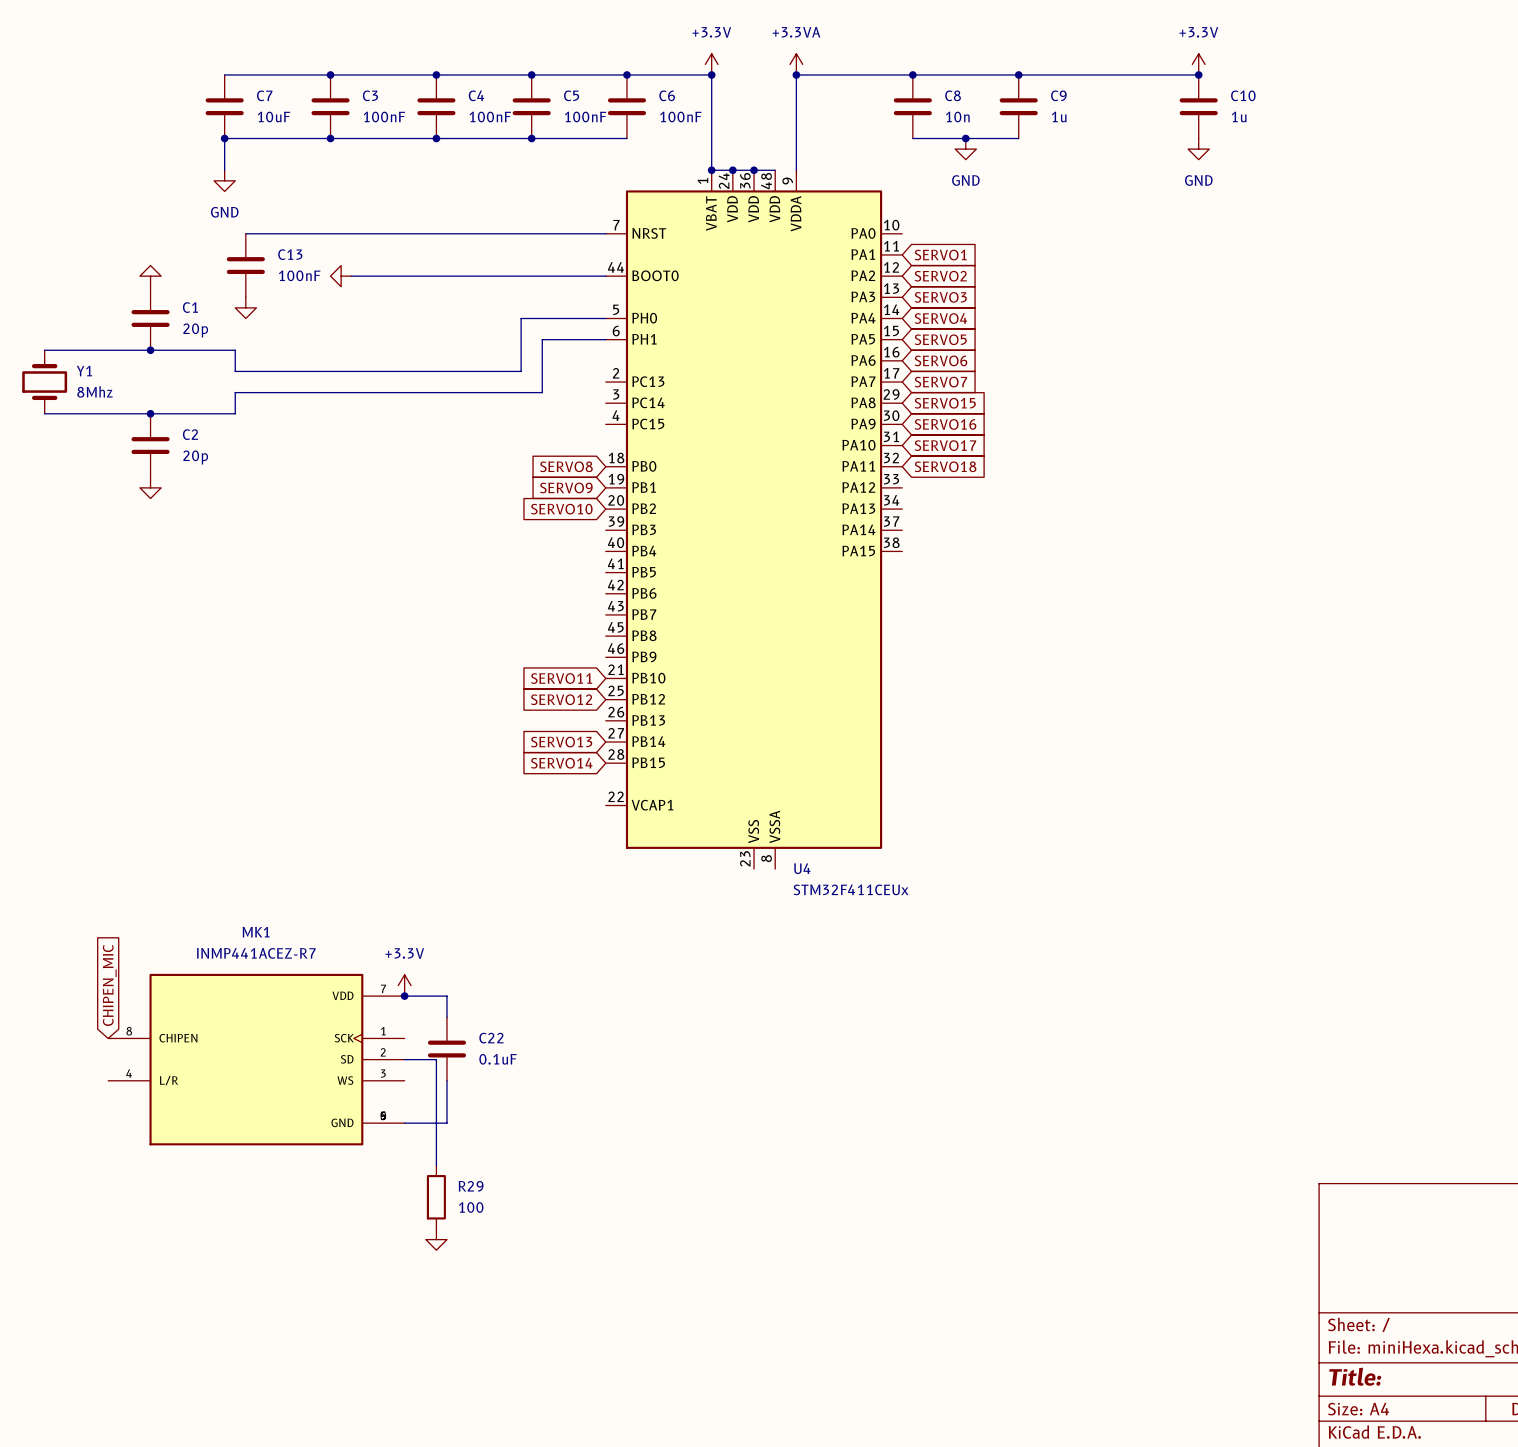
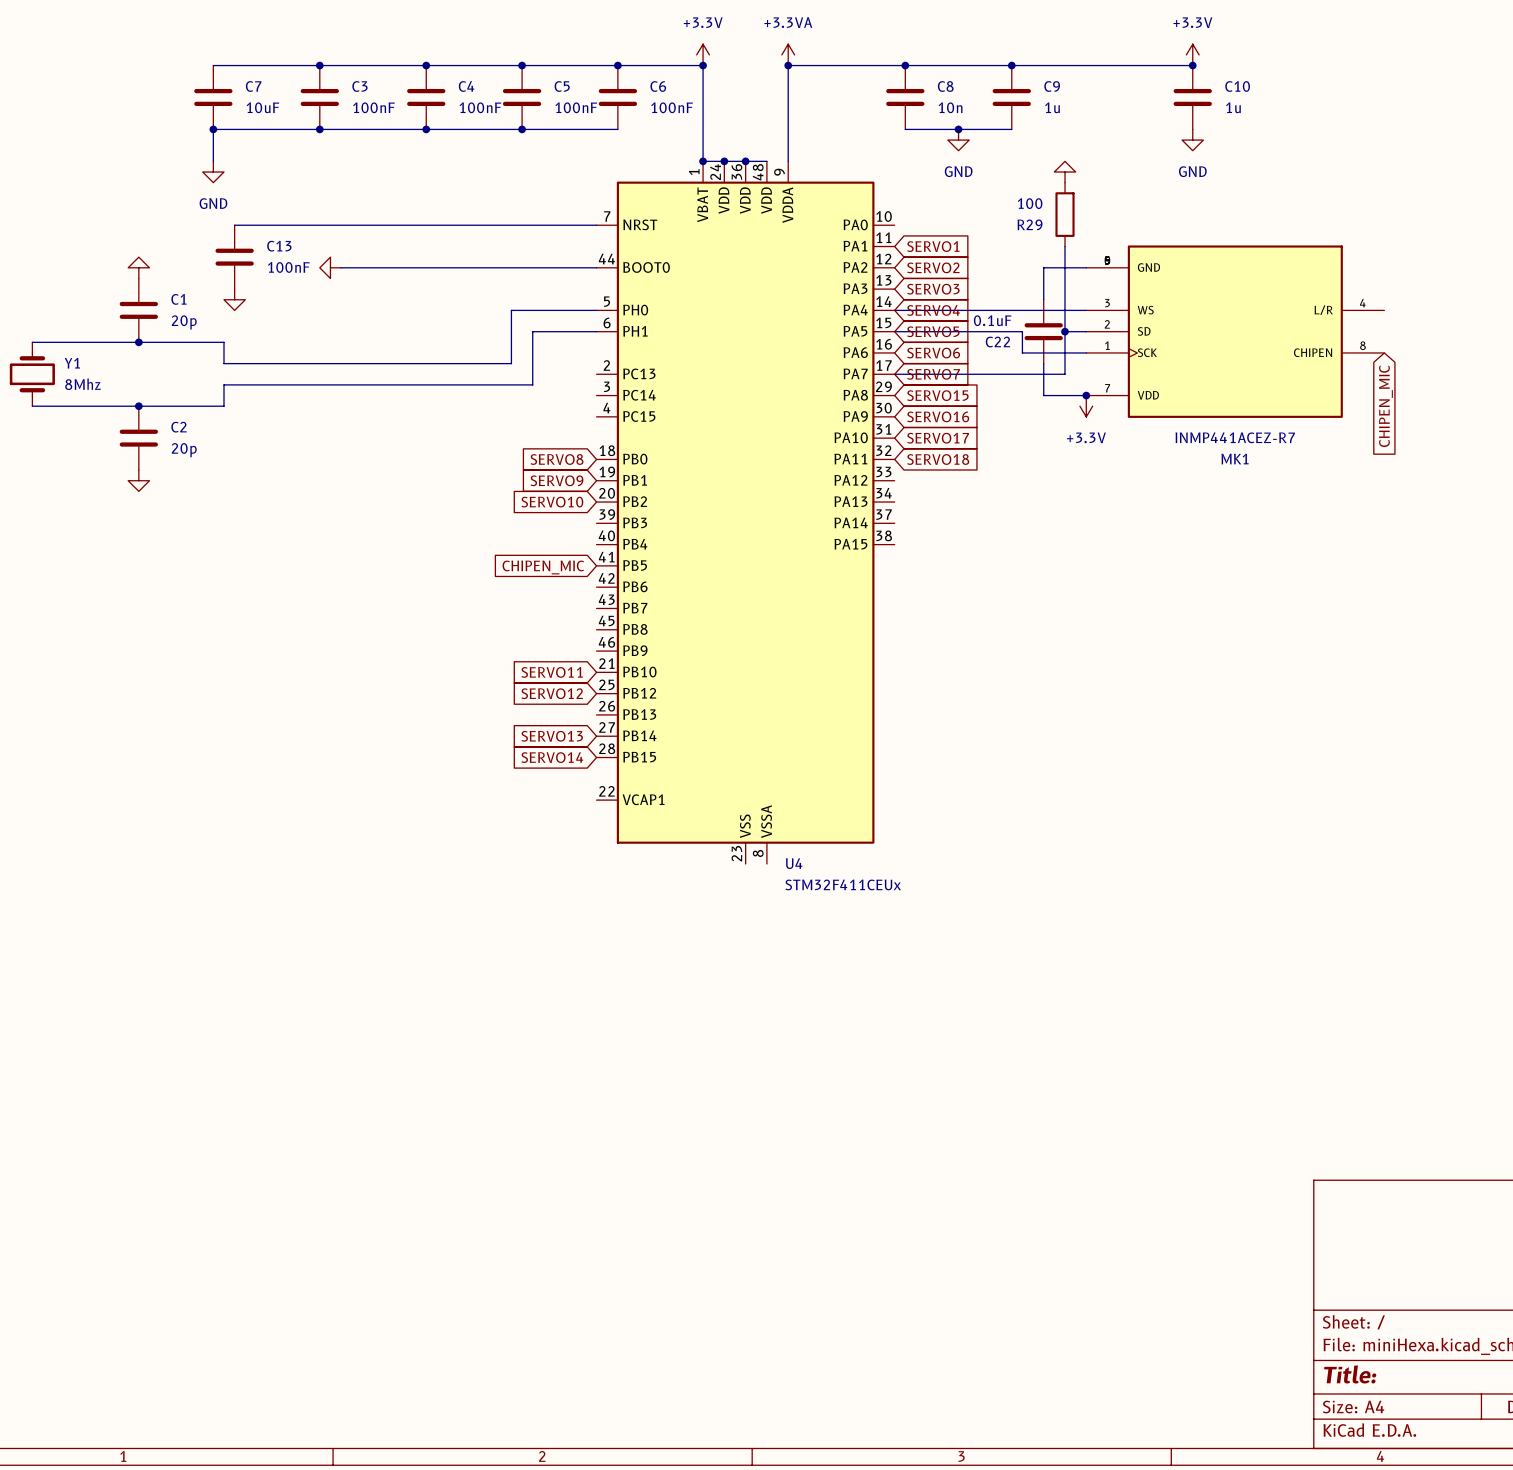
power symbol: none -> (1065, 172)
wire: none -> (1065, 246) (1065, 374) (894, 374)
wire: none -> (1086, 267) (1043, 267) (1043, 299)
wire: none -> (894, 310) (1086, 310)
wire: none -> (894, 331) (1022, 331) (1022, 352) (1086, 352)
wire: none -> (1065, 331) (1086, 331)
junction: none -> (1065, 331)
wire: none -> (1043, 363) (1043, 395) (1086, 395)
junction: none -> (1086, 395)
power symbol: none -> +3.3V (1086, 406)
global label: none -> CHIPEN_MIC (1385, 406)
global label: none -> CHIPEN_MIC (543, 567)
global label: CHIPEN_MIC (109, 985) -> none
power symbol: +3.3V (404, 985) -> none
wire: (404, 996) (446, 996) (446, 1017) -> none
junction: (404, 996) -> none
C22 name position: C22 (491, 1038) -> C22 (997, 342)
C22 position: (446, 1049) -> (1043, 331)
MK1 rotation: 0° (256, 1059) -> 180° (1235, 331)
MK1 position: (256, 1059) -> (1235, 331)
wire: (404, 1059) (436, 1059) (436, 1165) -> none
C22 value position: 0.1uF (498, 1059) -> 0.1uF (992, 320)
wire: (446, 1080) (446, 1123) (404, 1123) -> none
R29 name position: R29 (471, 1186) -> R29 (1029, 224)
R29 position: (436, 1197) -> (1065, 214)
R29 value position: 100 (471, 1207) -> 100 (1030, 203)
power symbol: (436, 1239) -> none

